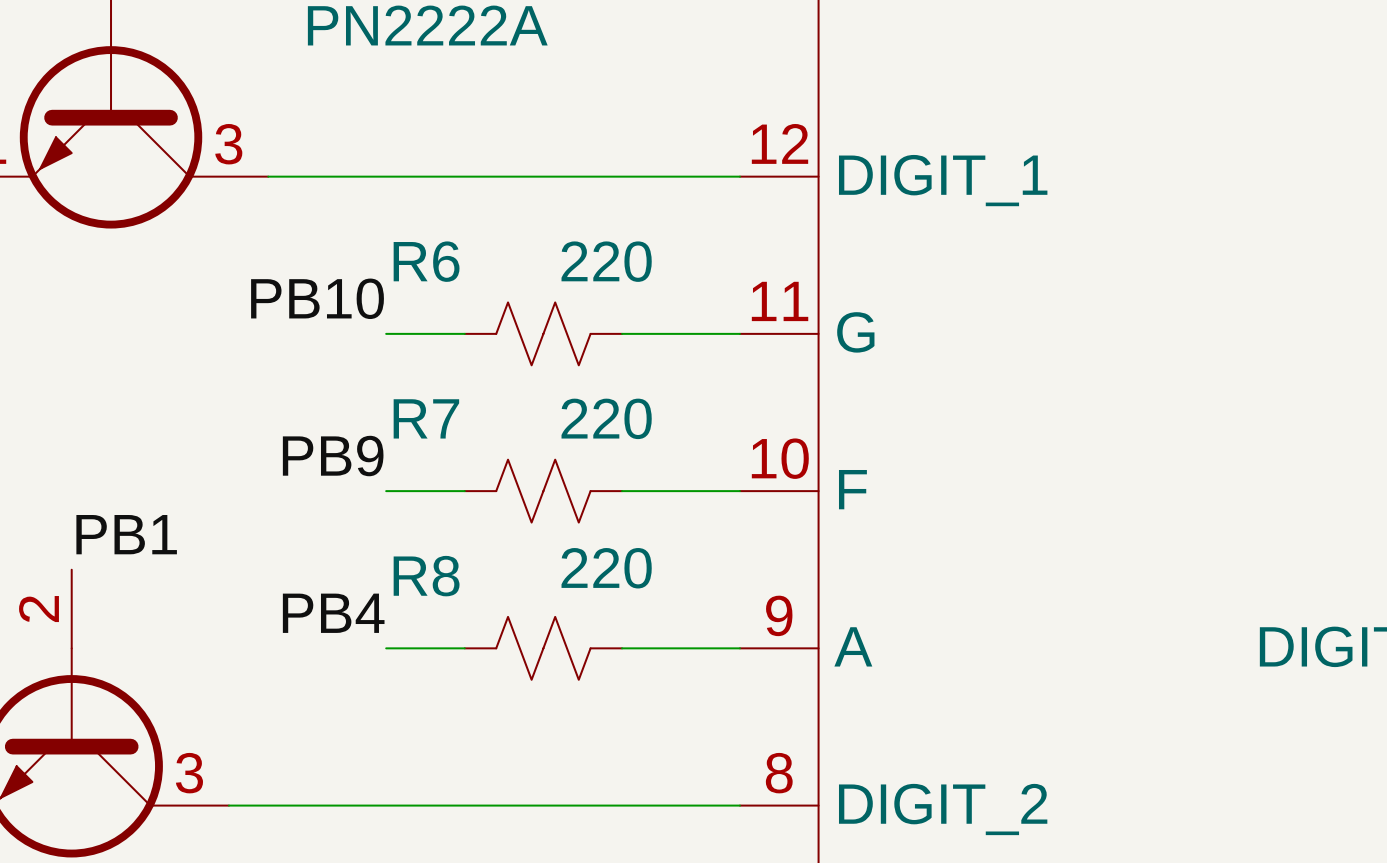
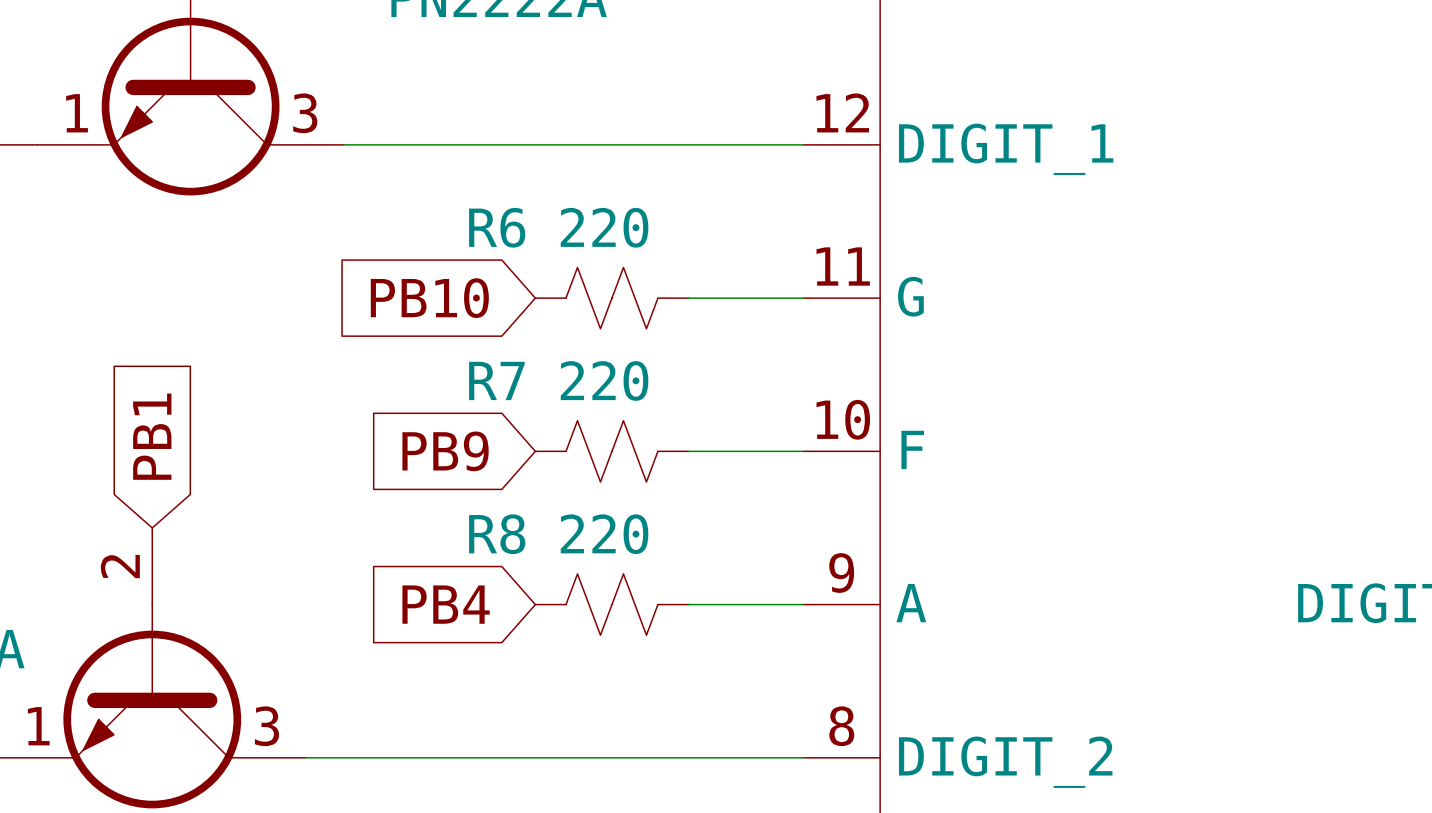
R6 value position: 220 (606, 261) -> 220 (604, 227)
label: PB10 (317, 298) -> none
global label: none -> PB10 (429, 298)
wire: (386, 333) (464, 333) -> none
R7 value position: 220 (606, 418) -> 220 (604, 380)
label: PB9 (333, 456) -> none
global label: none -> PB1 (152, 436)
global label: none -> PB9 (445, 451)
wire: (386, 491) (464, 491) -> none
label: PB1 (126, 534) -> none
R8 value position: 220 (606, 568) -> 220 (604, 534)
label: PB4 (333, 613) -> none
global label: none -> PB4 (446, 604)
wire: (386, 648) (464, 648) -> none

